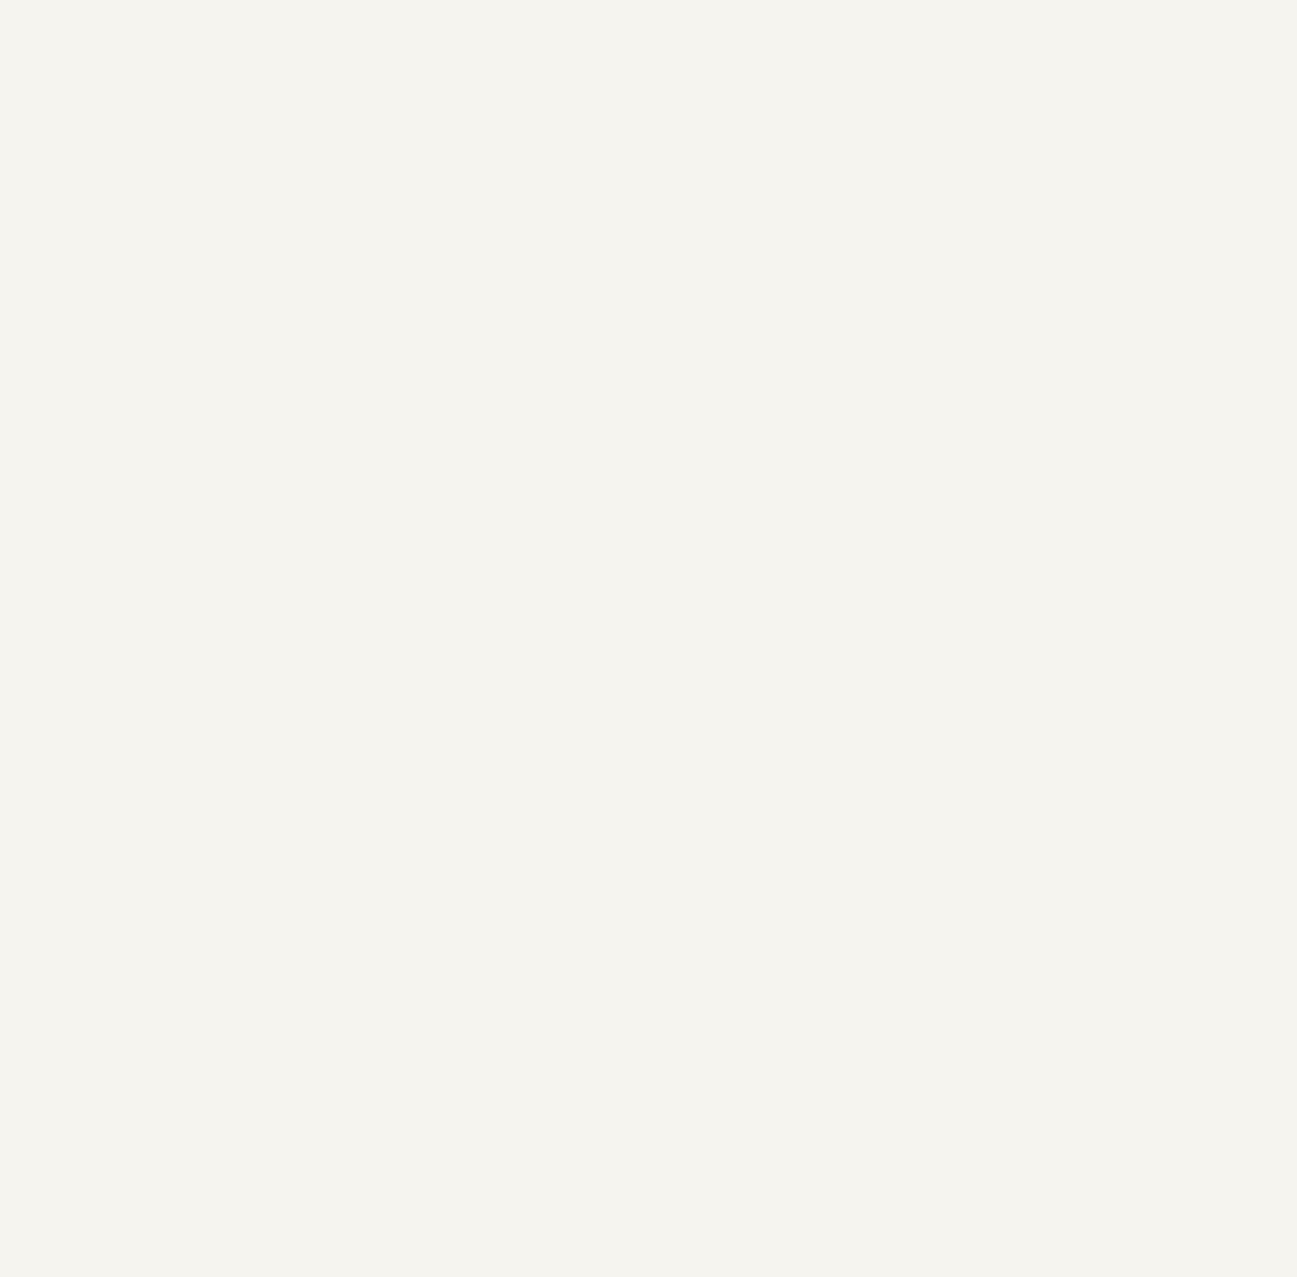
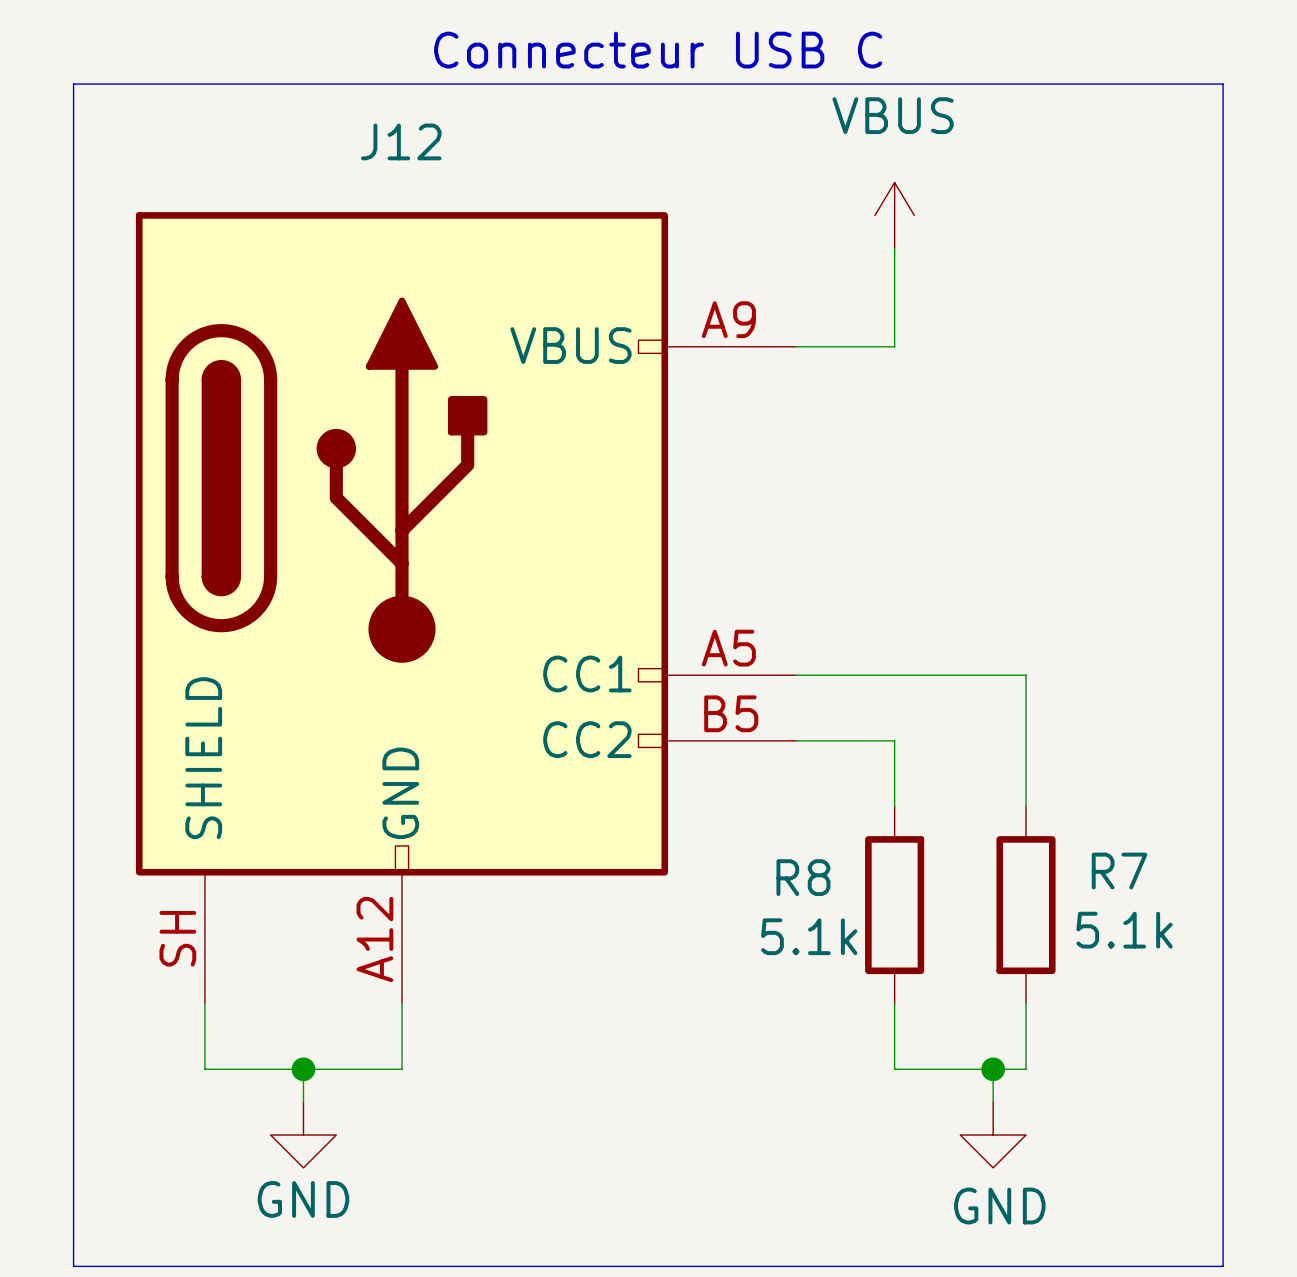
text: none -> Connecteur USB C (658, 50)
line: none -> (73, 84) (73, 1266) (1223, 1266) (1223, 84) (73, 84)
power symbol: none -> VBUS (894, 215)
wire: none -> (894, 248) (894, 346) (796, 346)
J12: none -> (466, 607)
wire: none -> (796, 675) (1026, 675) (1026, 806)
wire: none -> (796, 740) (894, 740) (894, 806)
R8: none -> 5.1k (894, 905)
R7: none -> 5.1k (1026, 905)
wire: none -> (204, 1003) (204, 1069) (402, 1069) (402, 1003)
wire: none -> (894, 1003) (894, 1069) (1026, 1069) (1026, 1003)
wire: none -> (303, 1069) (303, 1102)
junction: none -> (303, 1069)
wire: none -> (993, 1069) (993, 1102)
junction: none -> (993, 1069)
power symbol: none -> GND (303, 1135)
power symbol: none -> GND (993, 1135)

